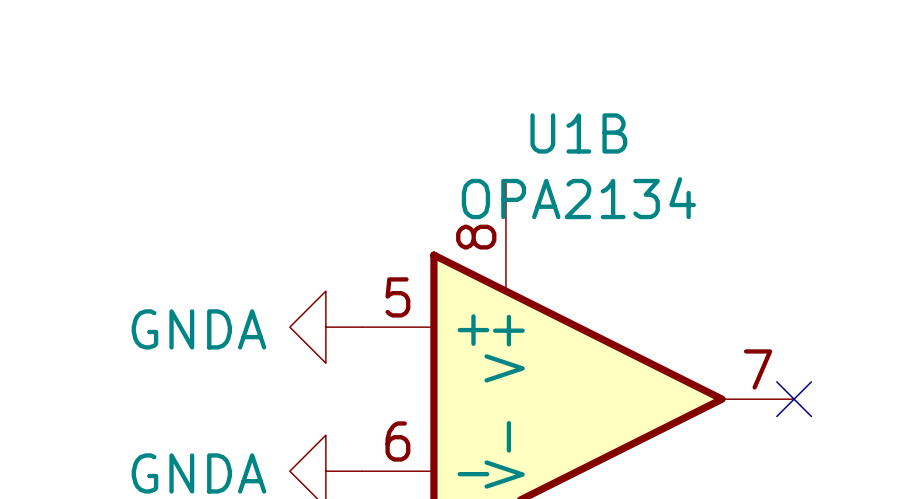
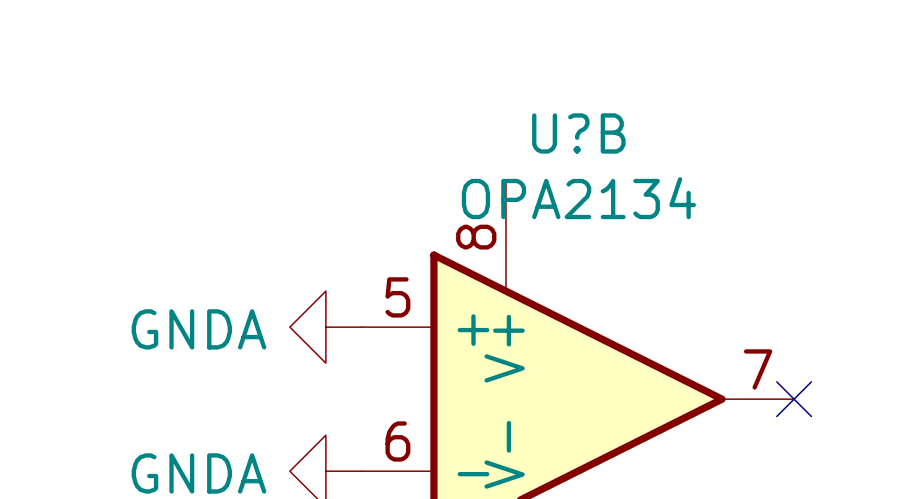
U1B name: U1B (578, 133) -> U?B (578, 133)

